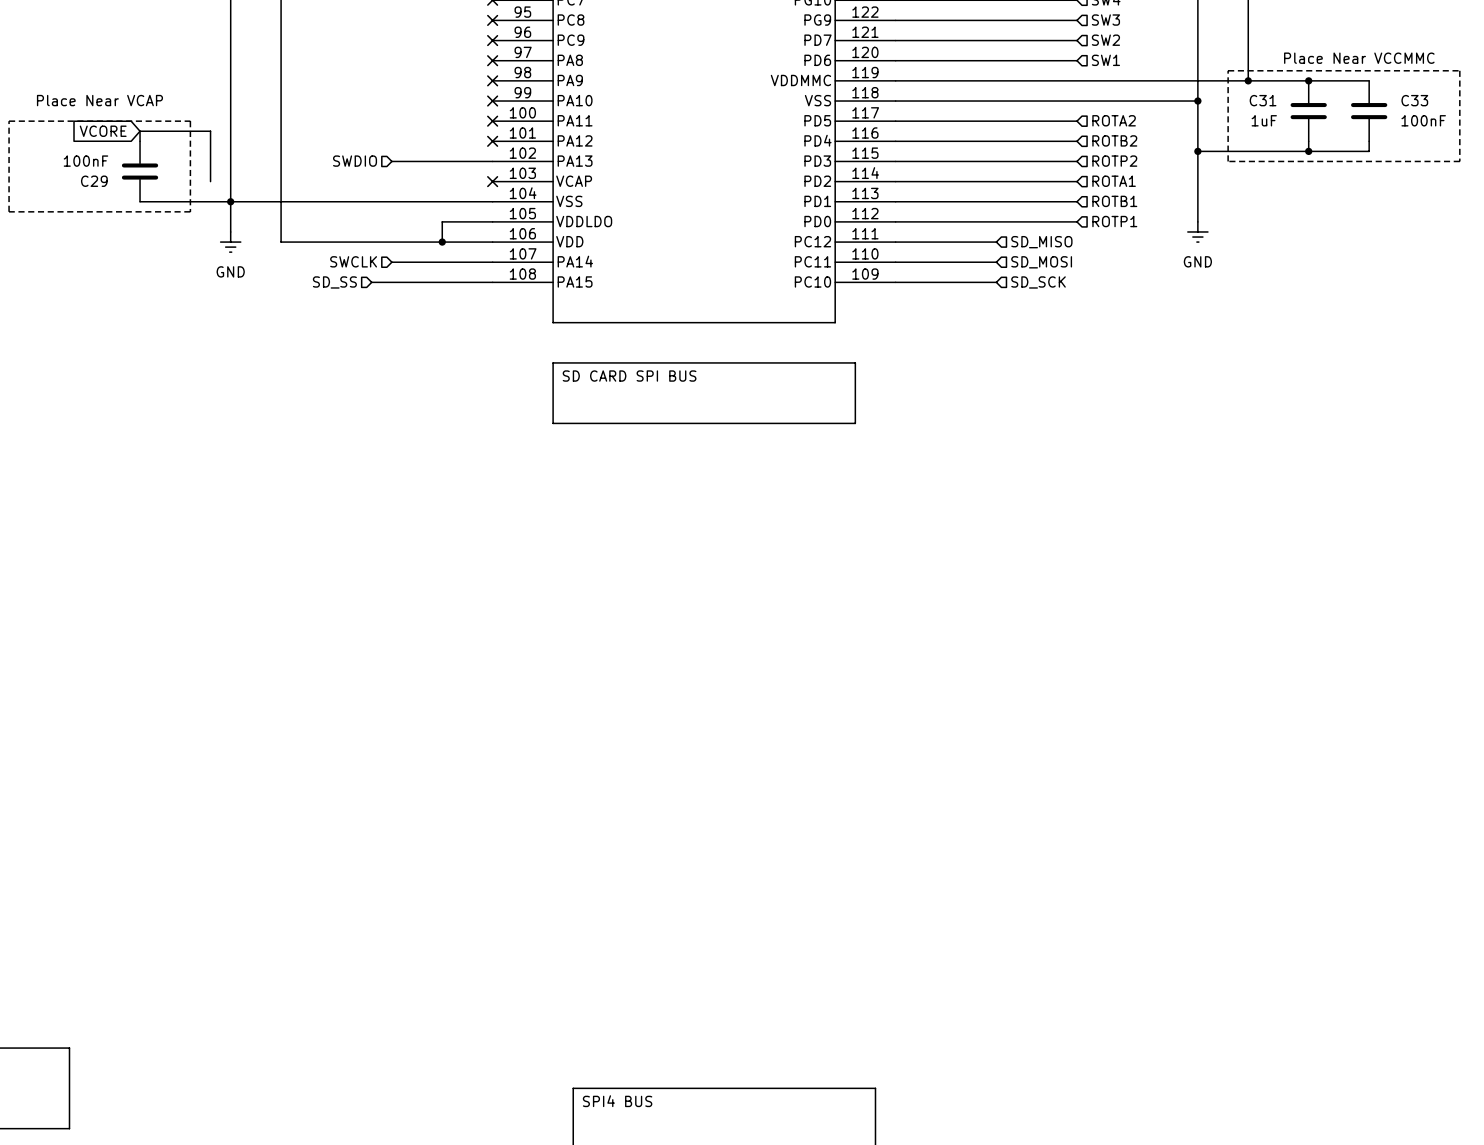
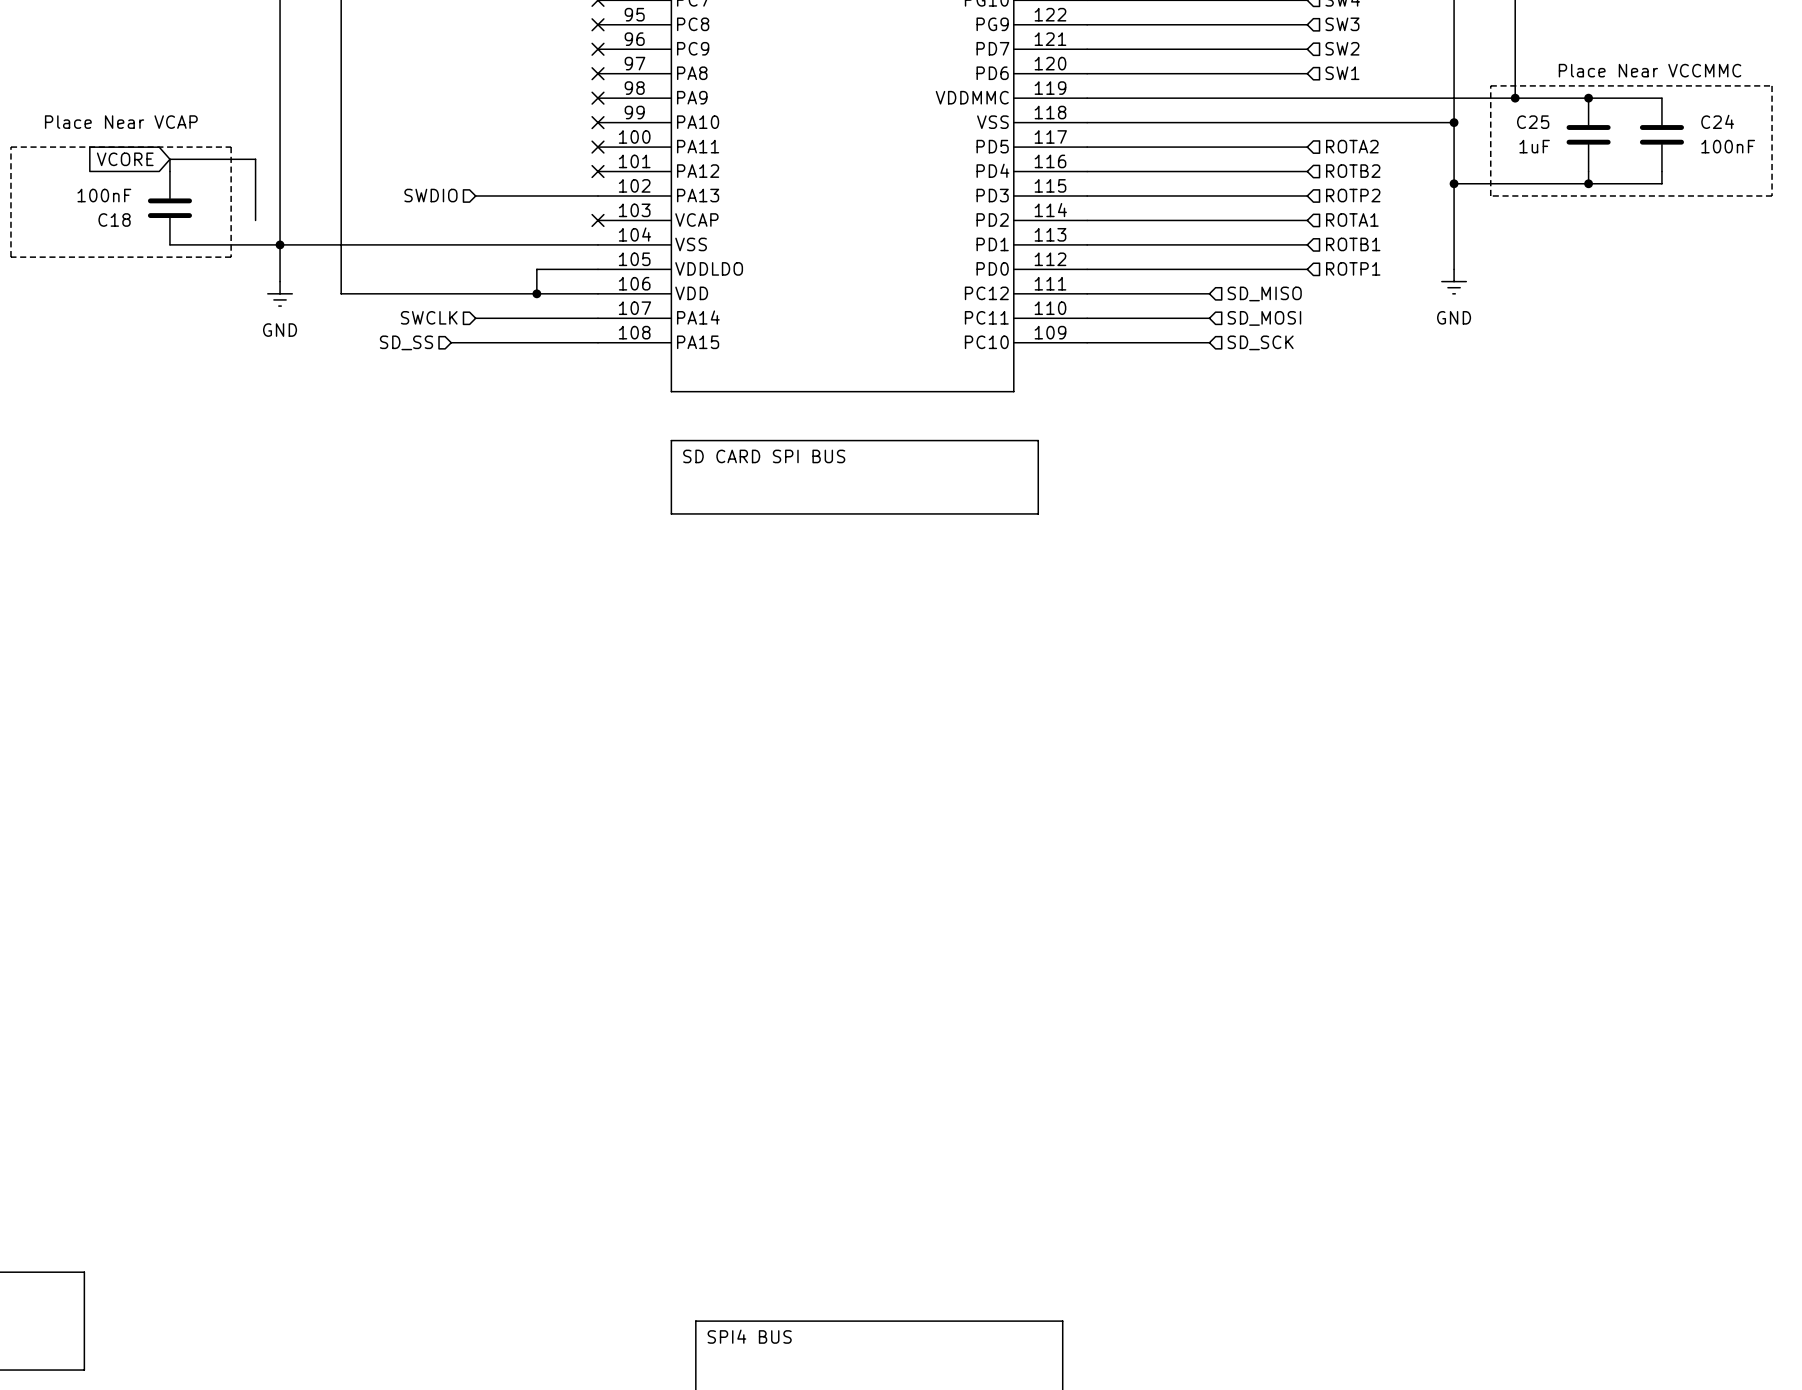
C31 name: C31 (1263, 100) -> C25 (1533, 122)
C33 name: C33 (1414, 100) -> C24 (1717, 121)
C29 name: C29 (94, 181) -> C18 (114, 219)

